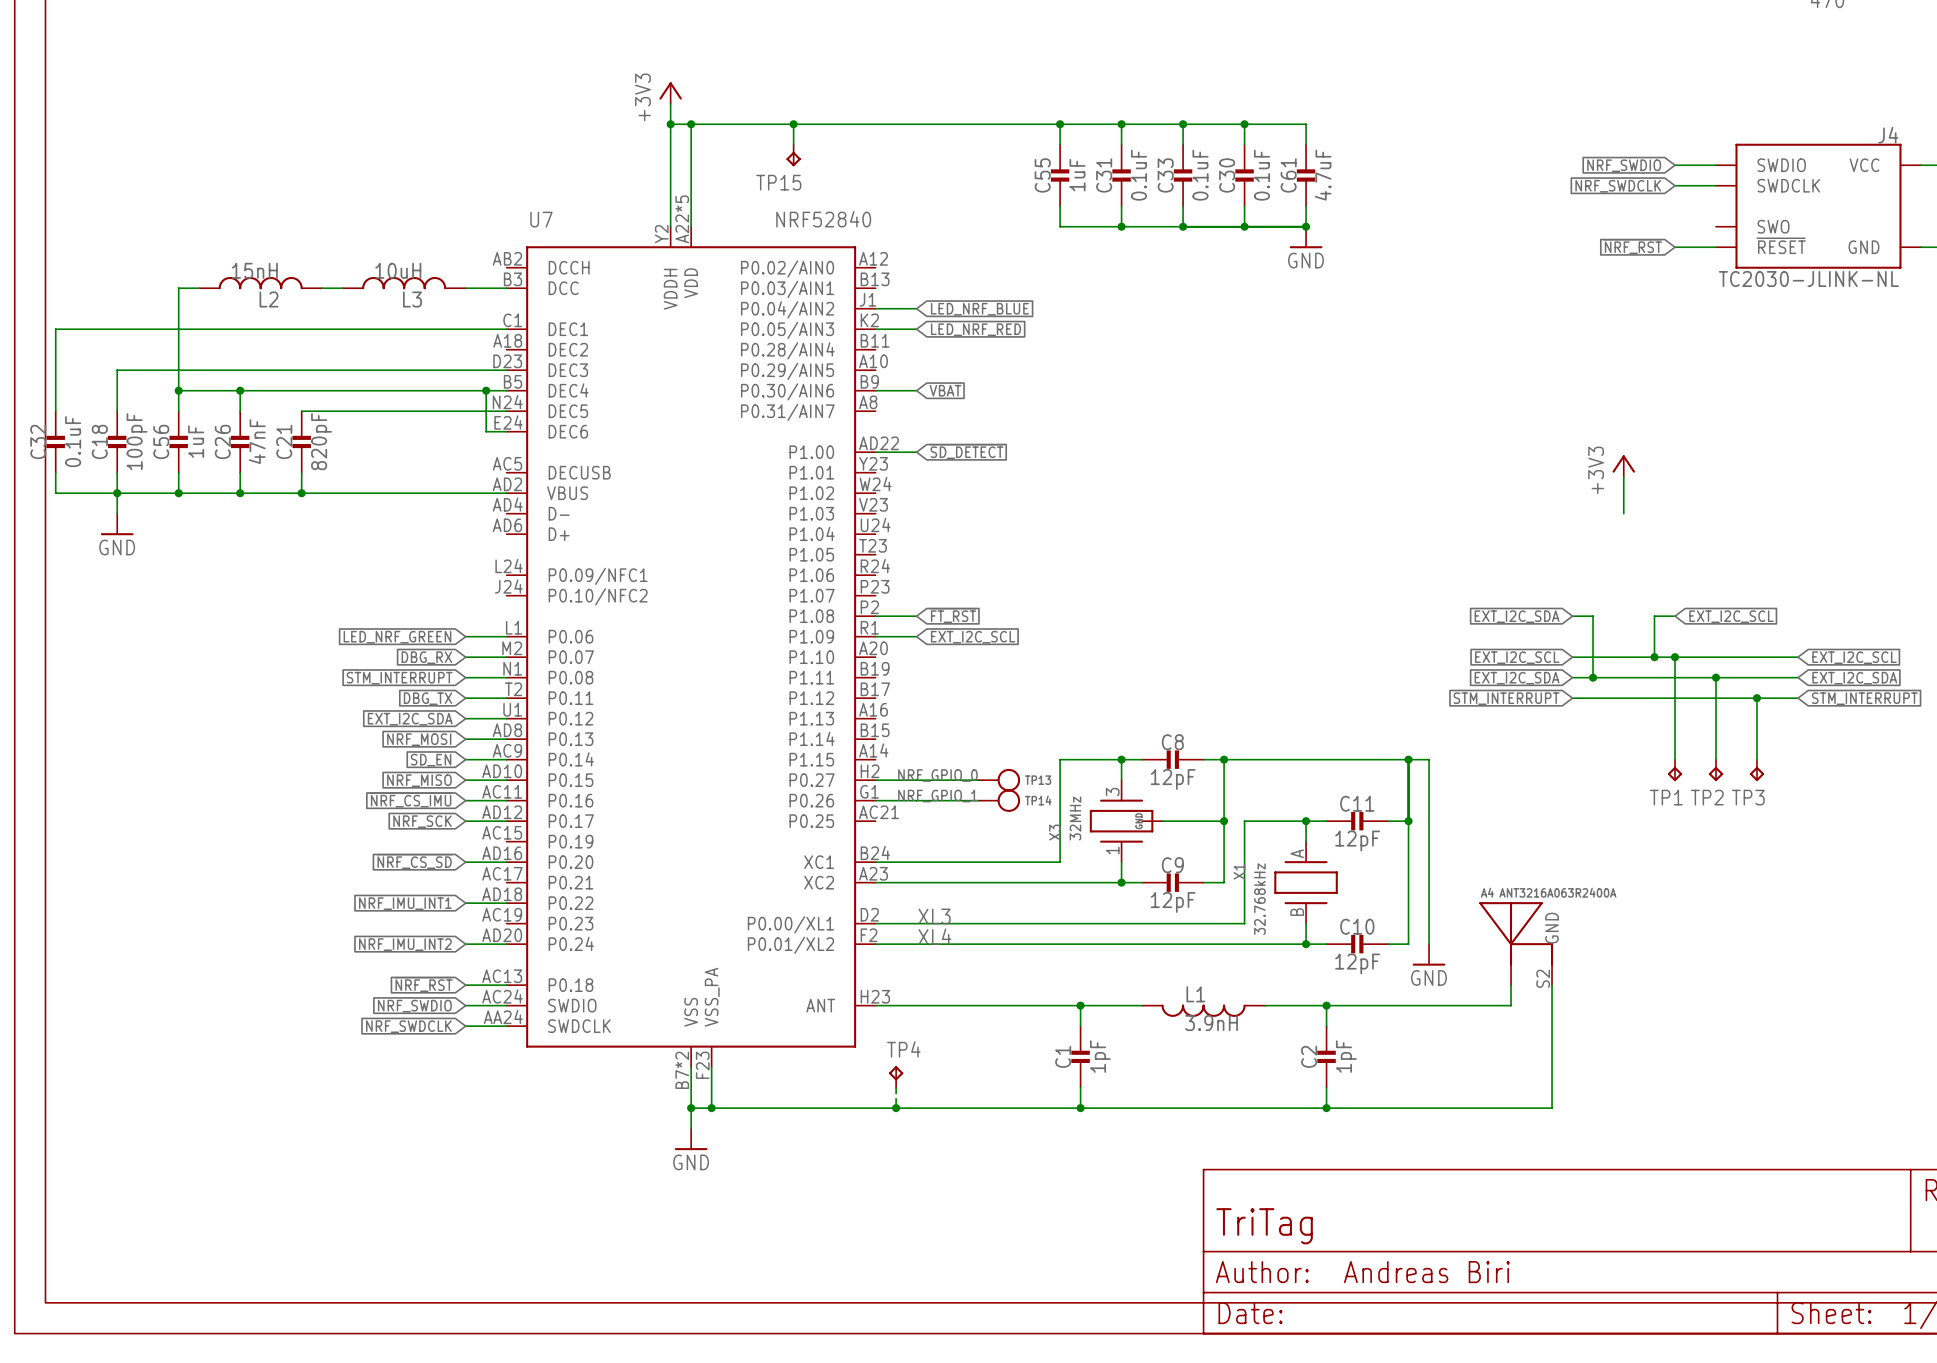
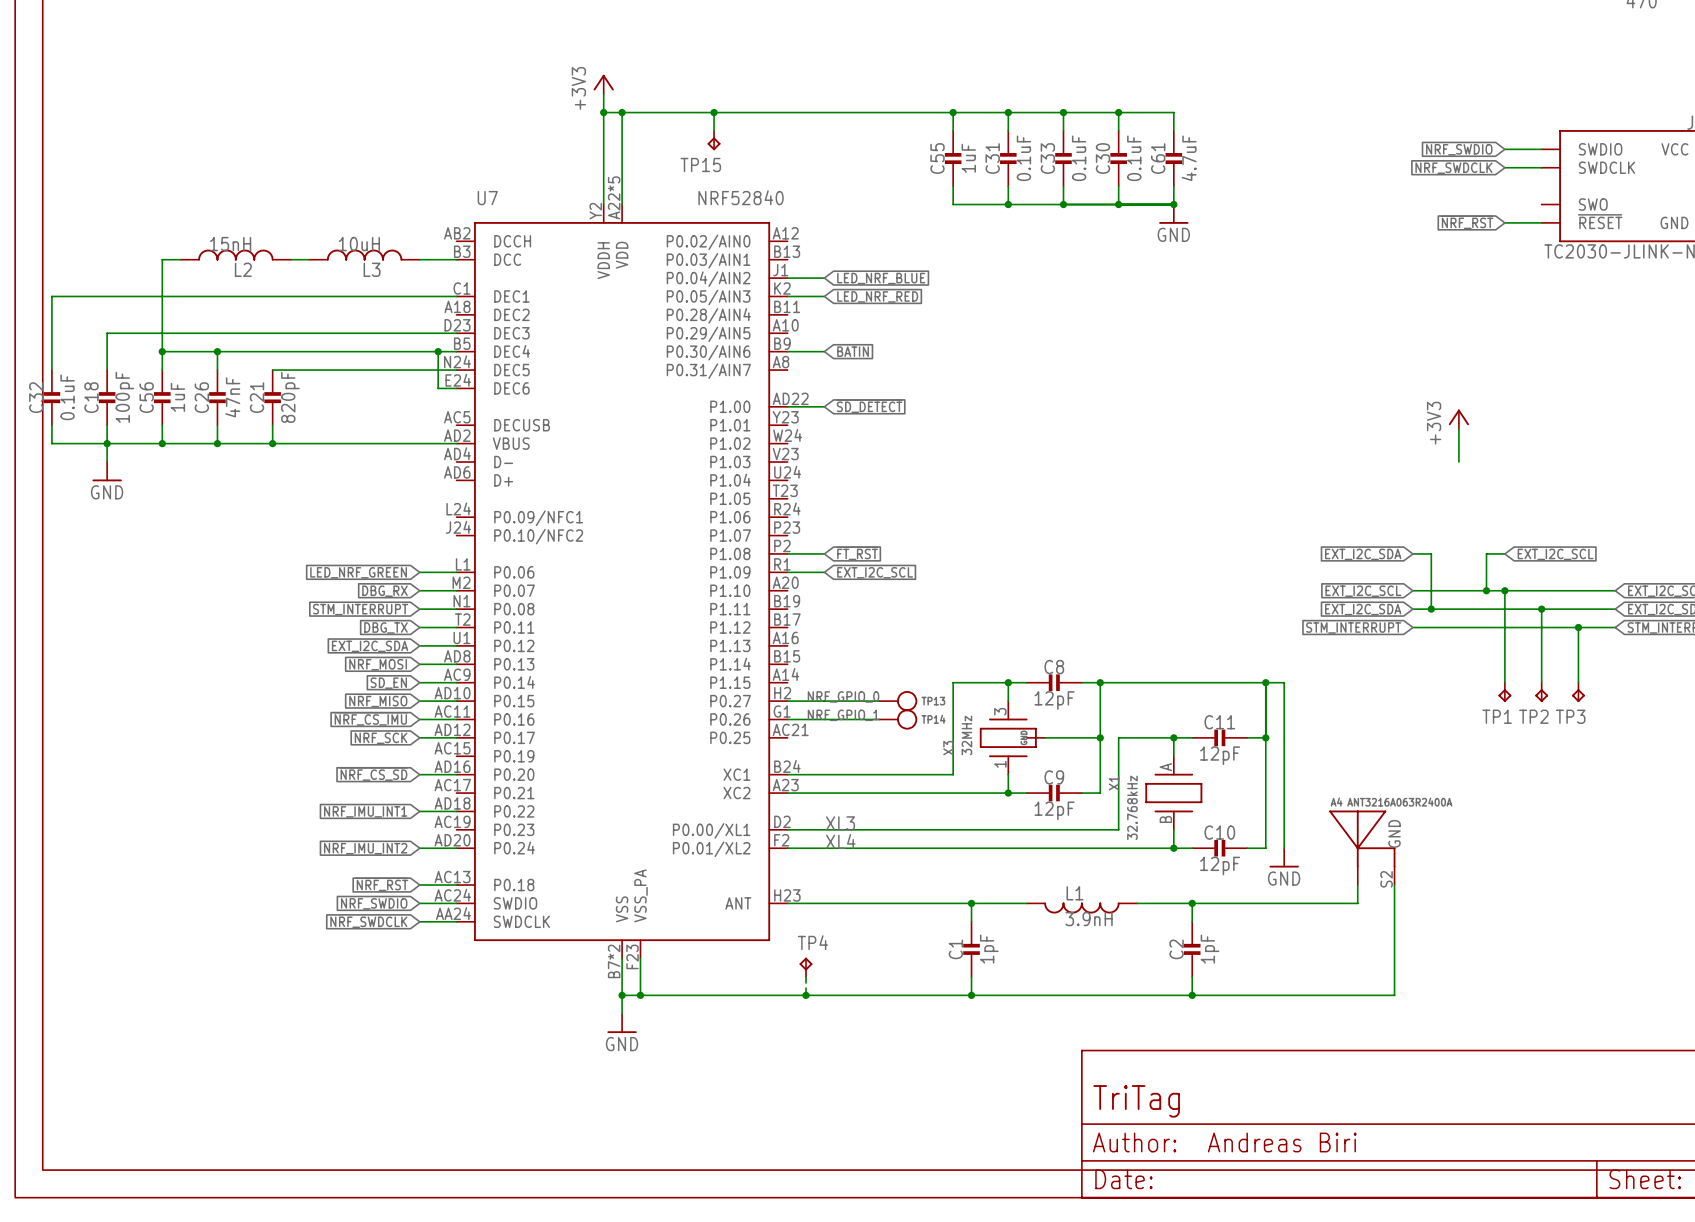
global label: VBAT (945, 390) -> BATIN (853, 351)

